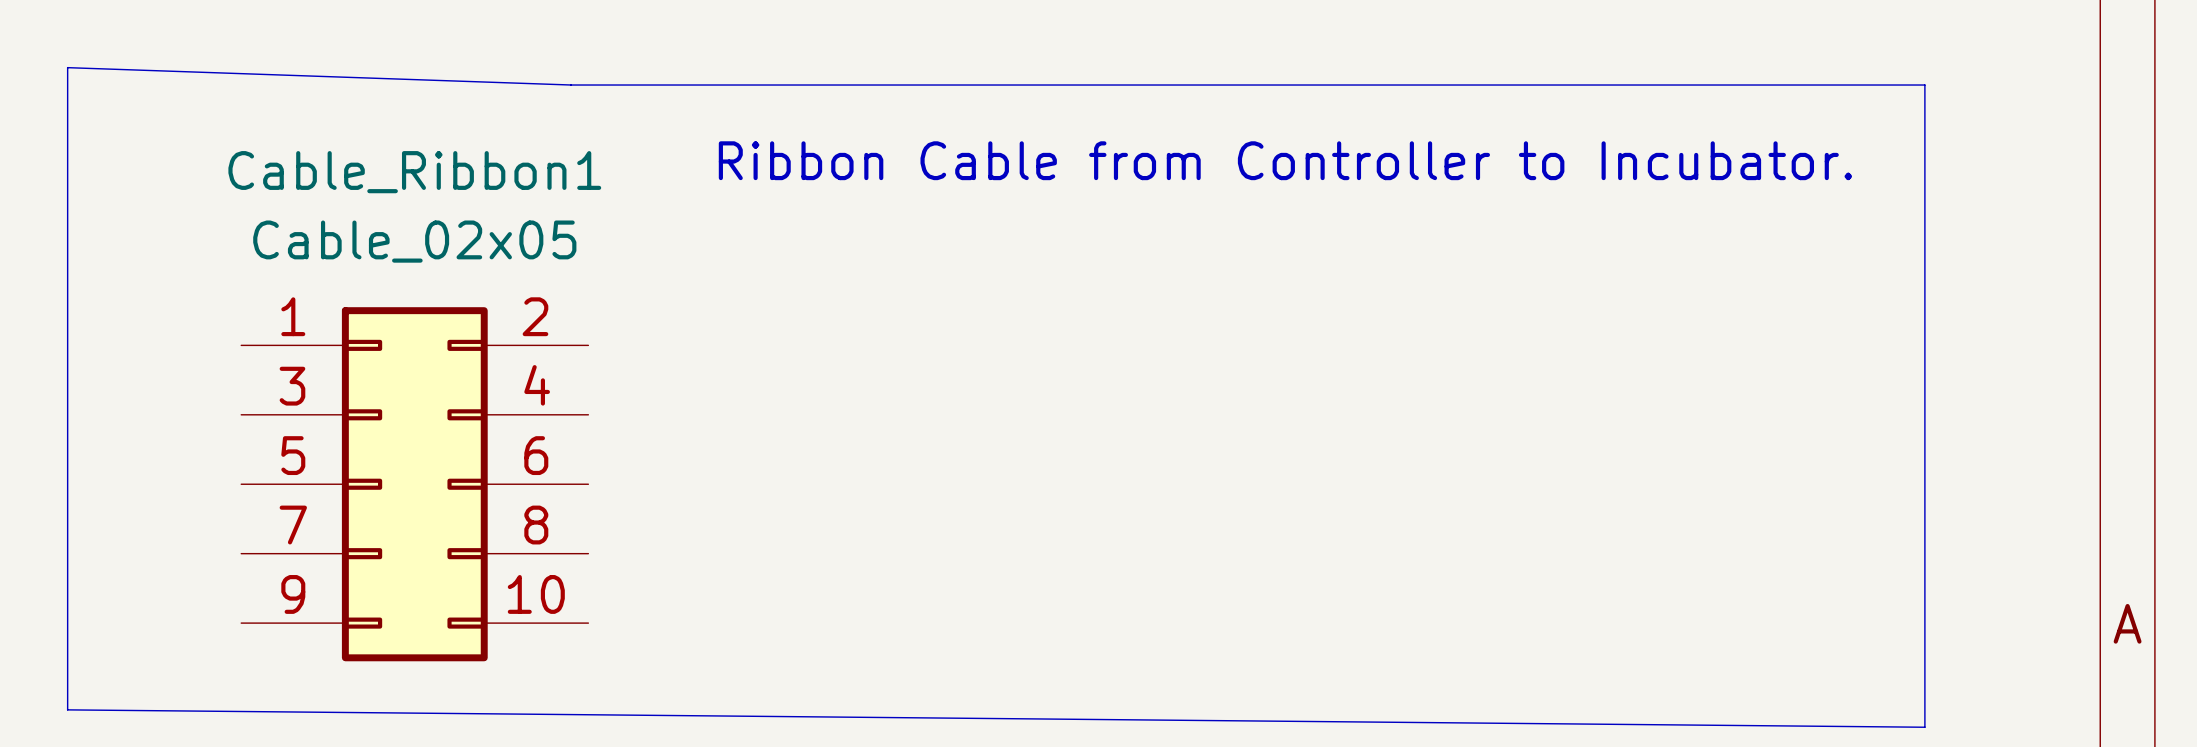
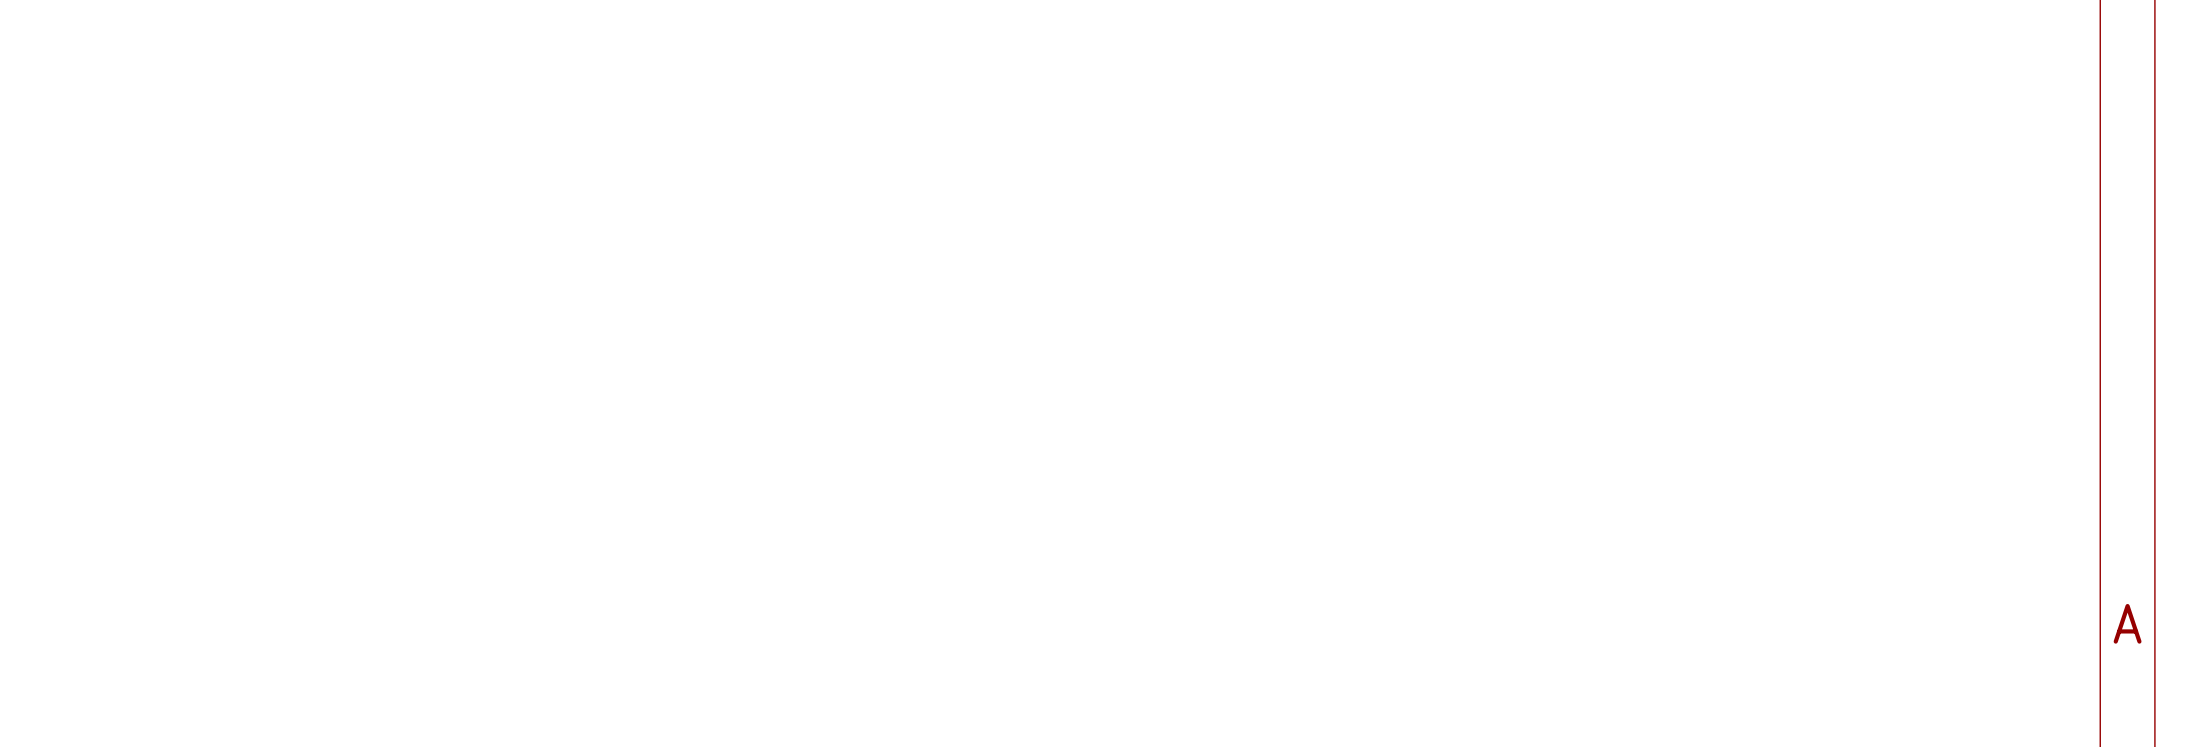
line: (67, 67) (67, 709) (1924, 727) (1924, 85) (571, 85) (67, 67) -> none
text: Ribbon Cable from Controller to Incubator. (1285, 160) -> none
Cable_Ribbon1: Cable_02x05 (414, 484) -> none

